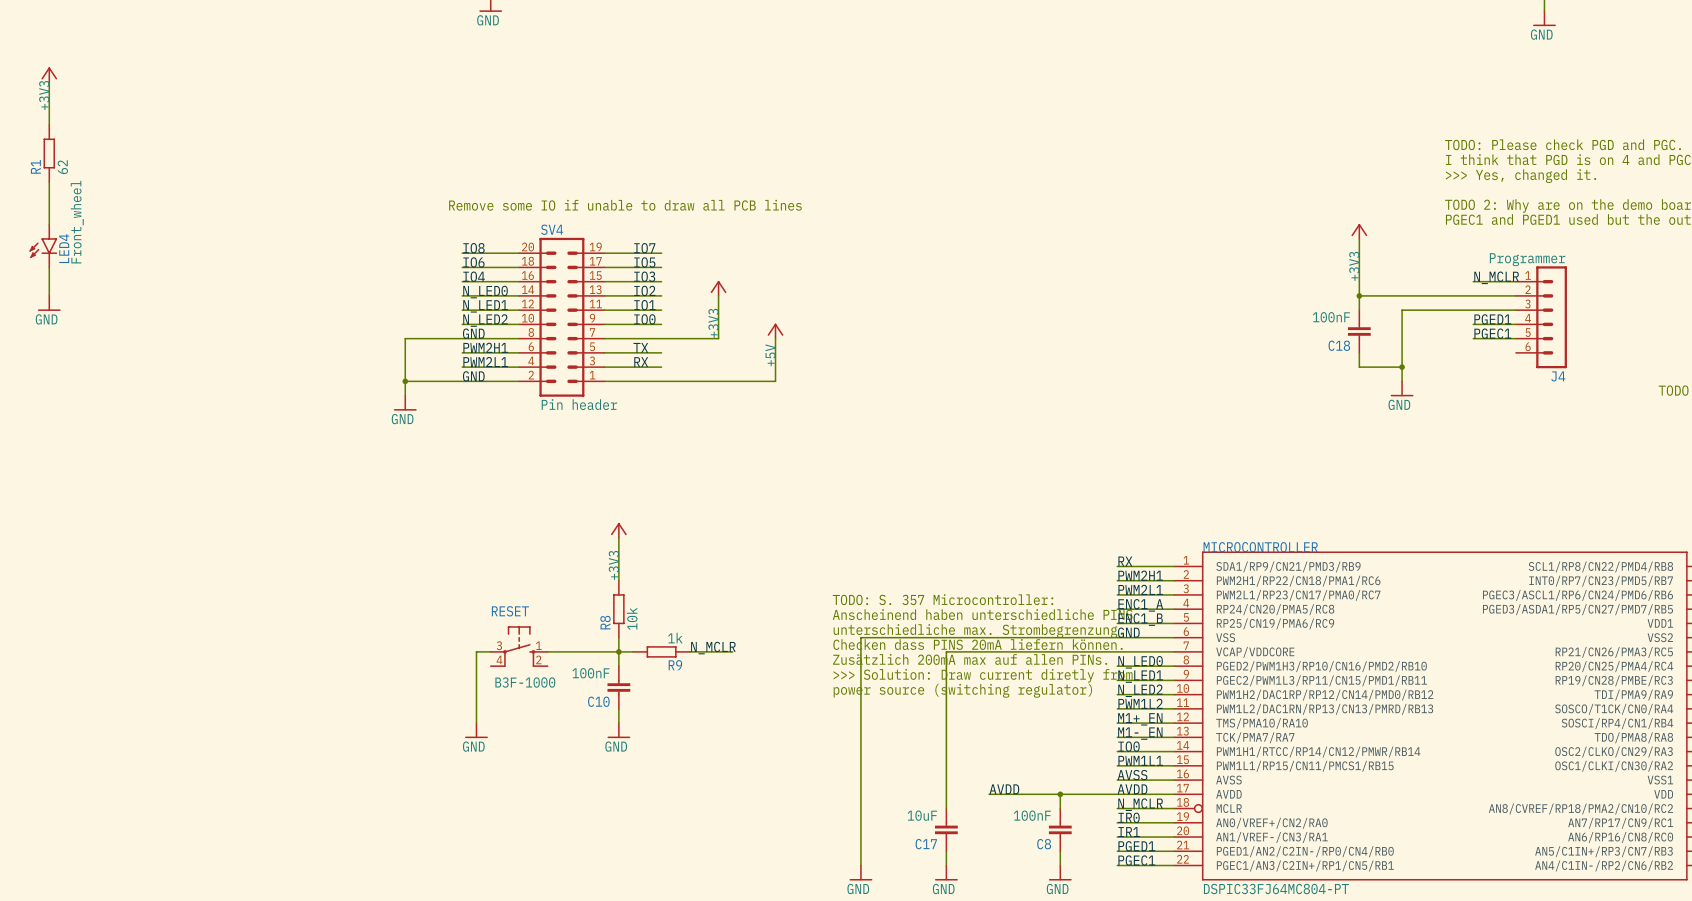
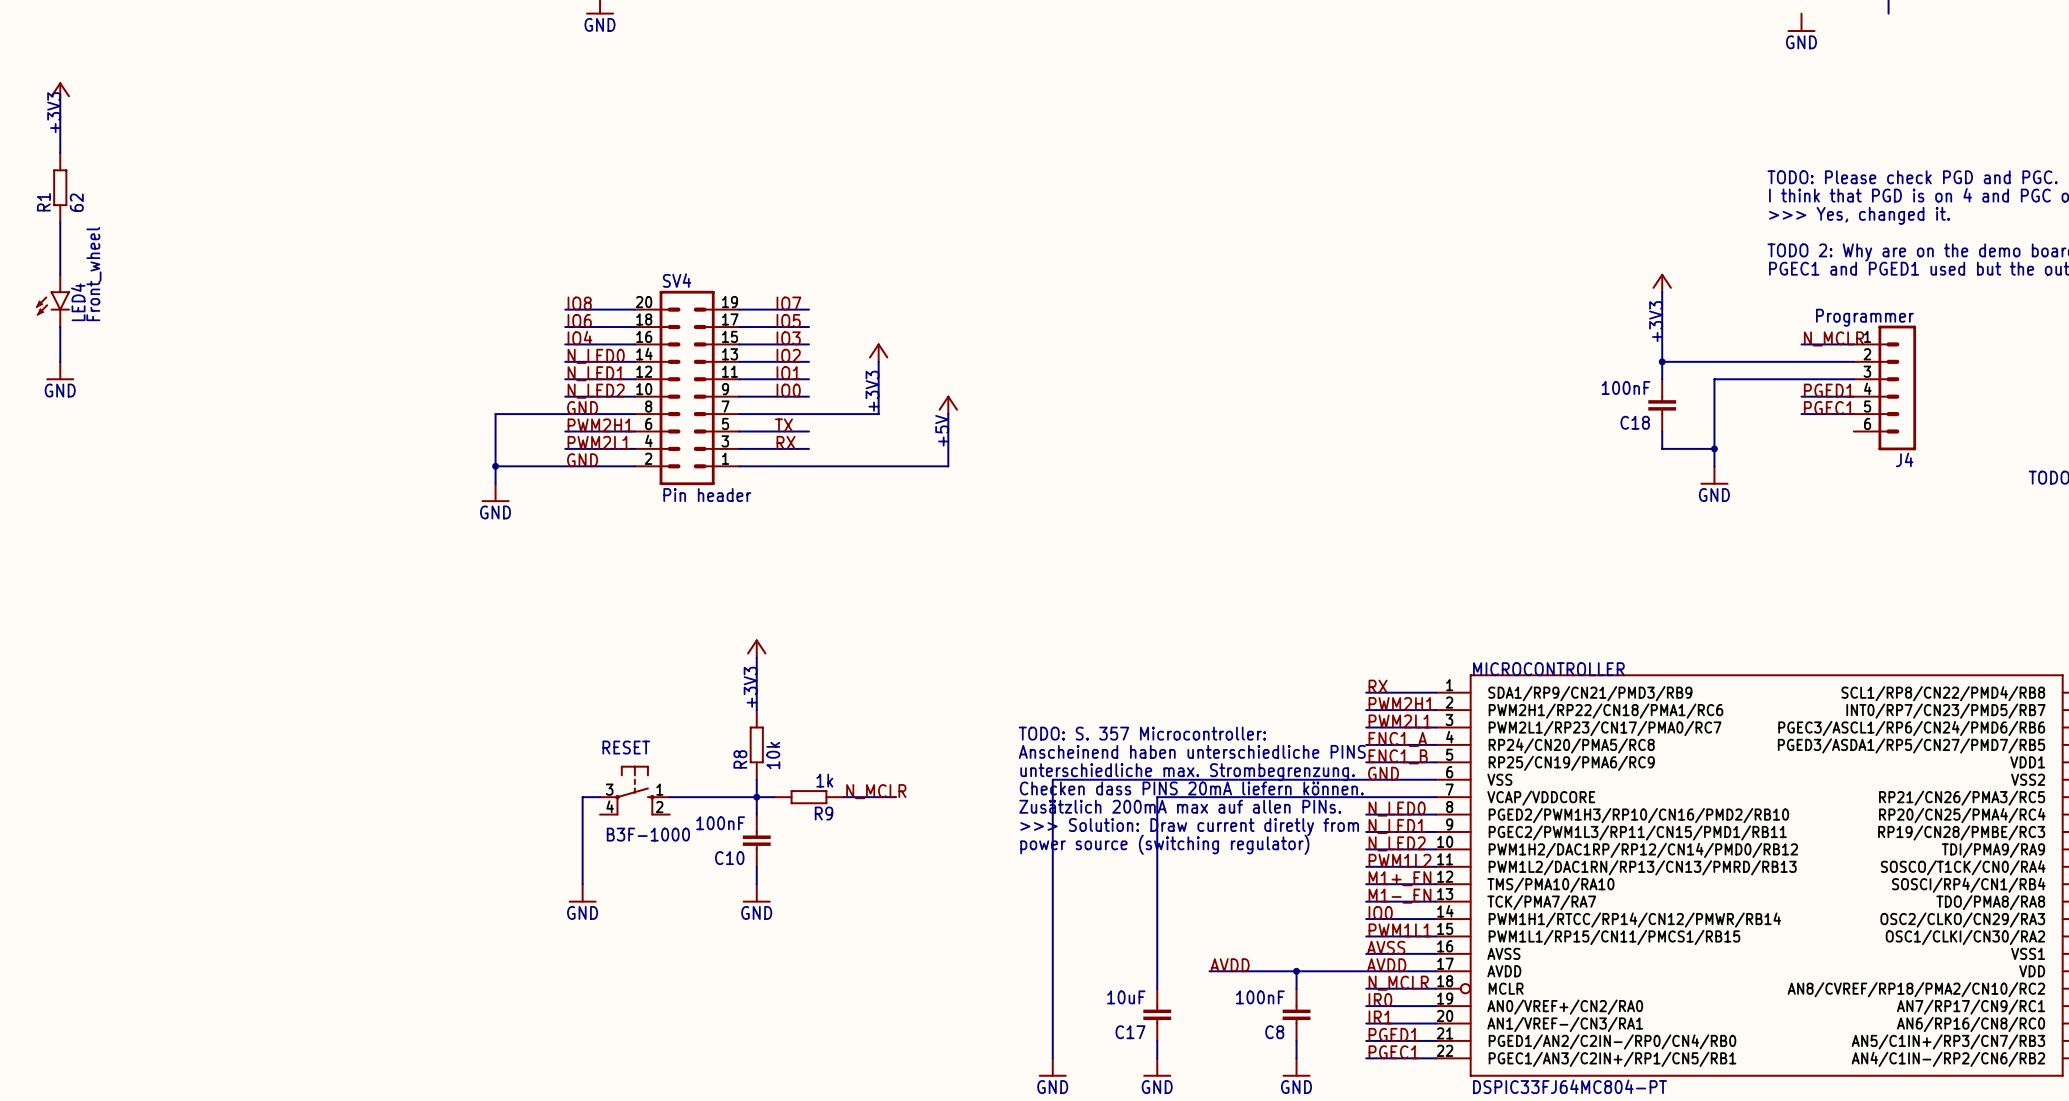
power symbol position: GND (1544, 18) -> GND (1801, 22)
text: Remove some IO if unable to draw all PCB lines (625, 205) -> none

